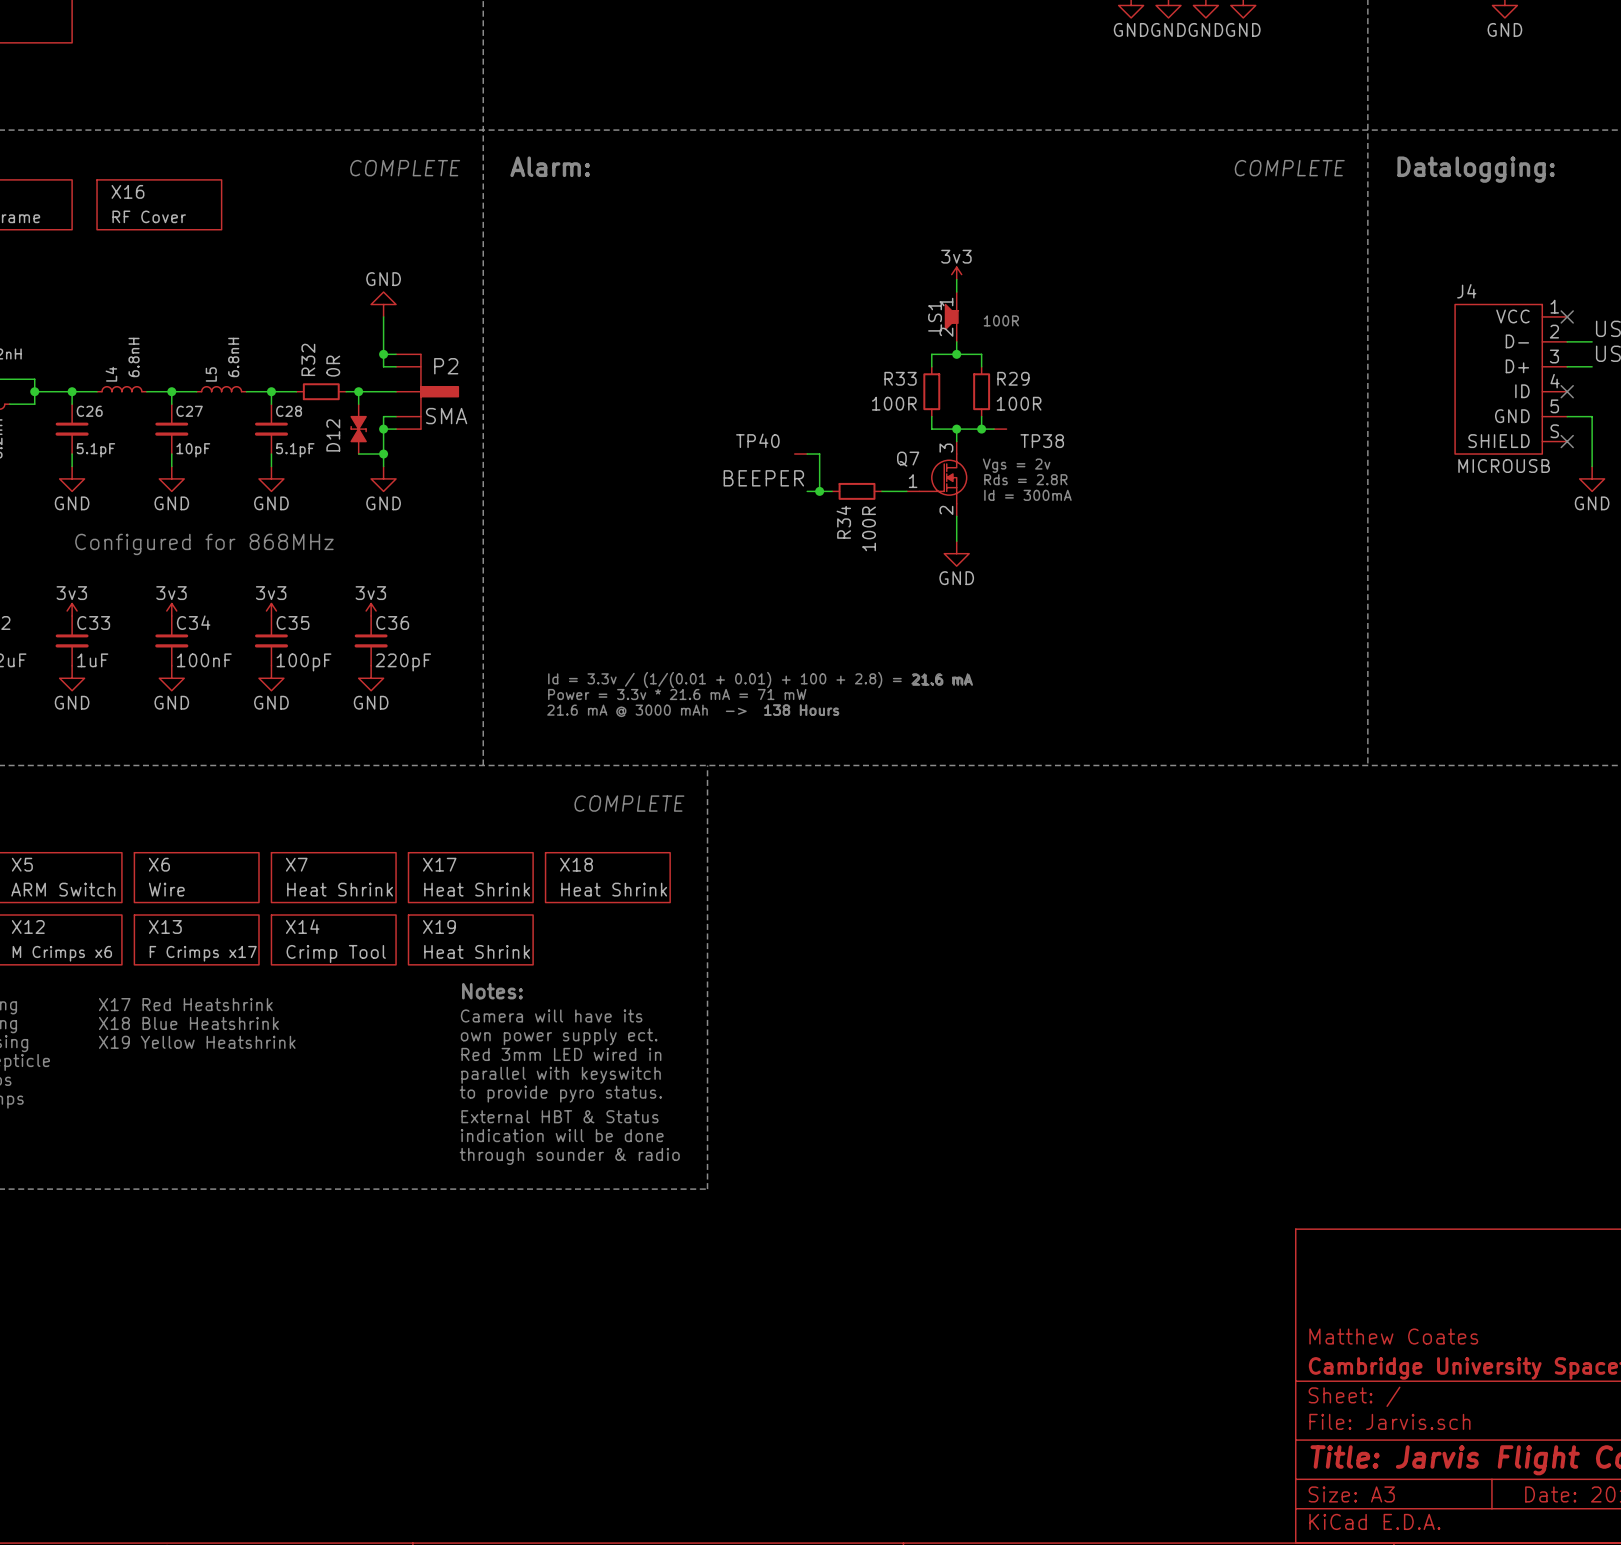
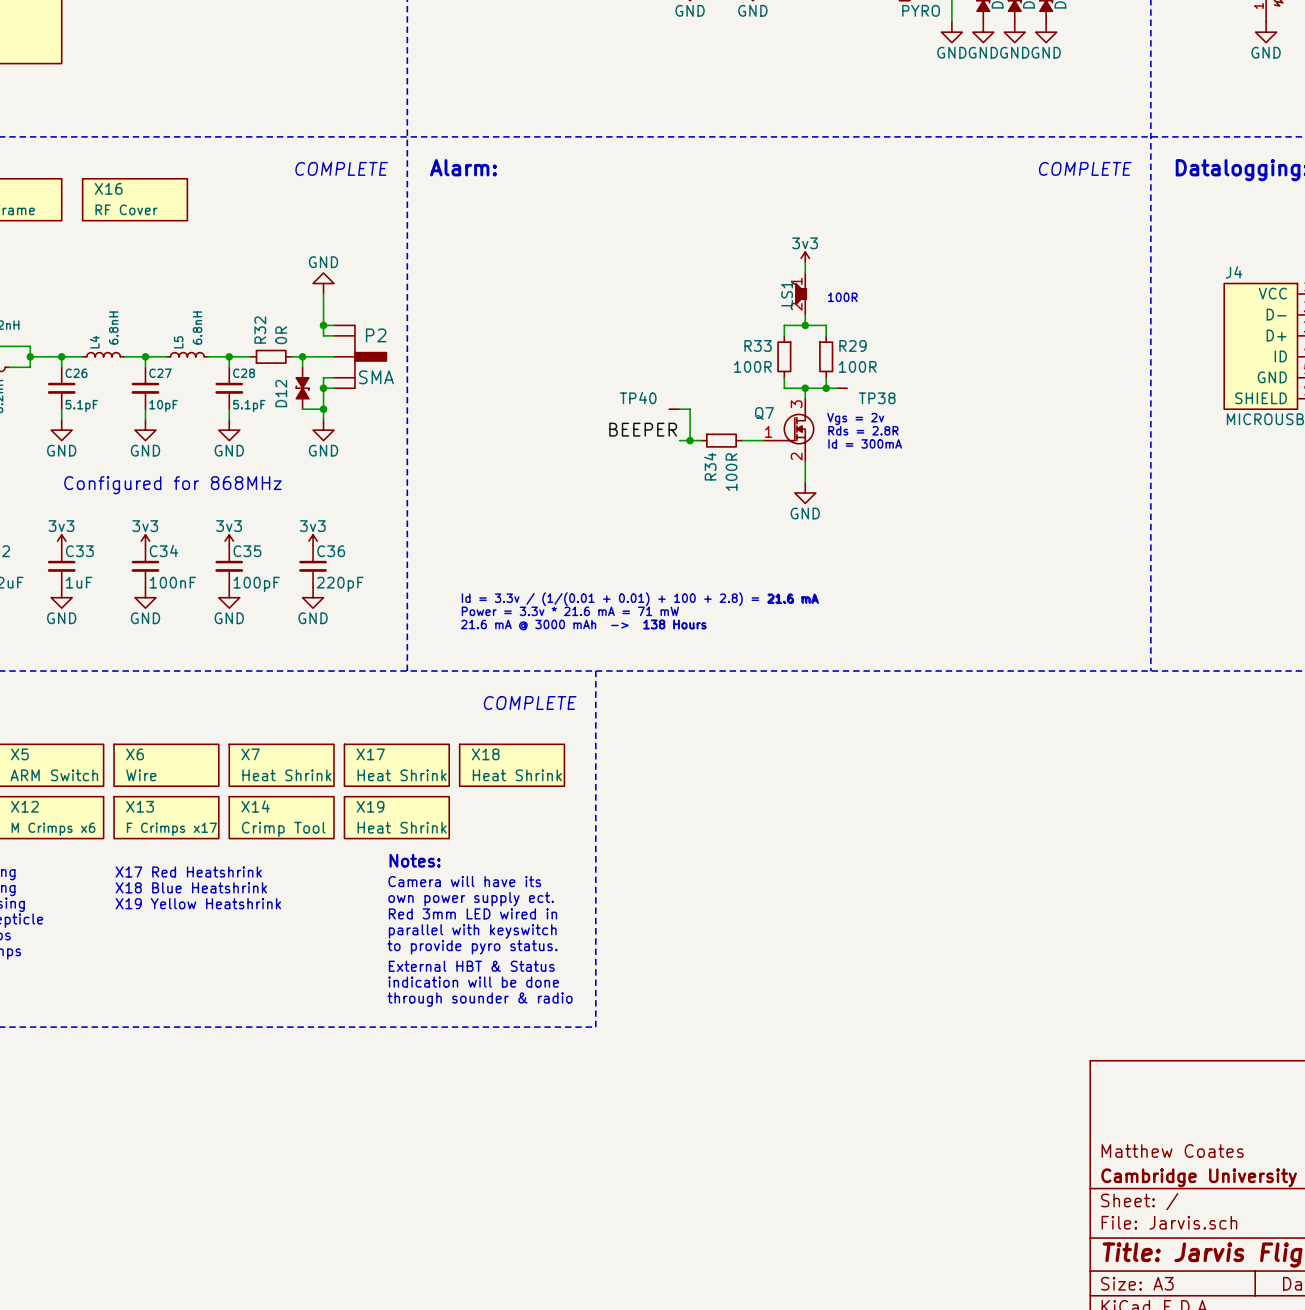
text position: X17 Red Heatshrink (185, 1004) -> X17 Red Heatshrink (188, 872)
text position: X18 Blue Heatshrink (188, 1023) -> X18 Blue Heatshrink (191, 887)
text position: X19 Yellow Heatshrink (197, 1042) -> X19 Yellow Heatshrink (198, 903)

